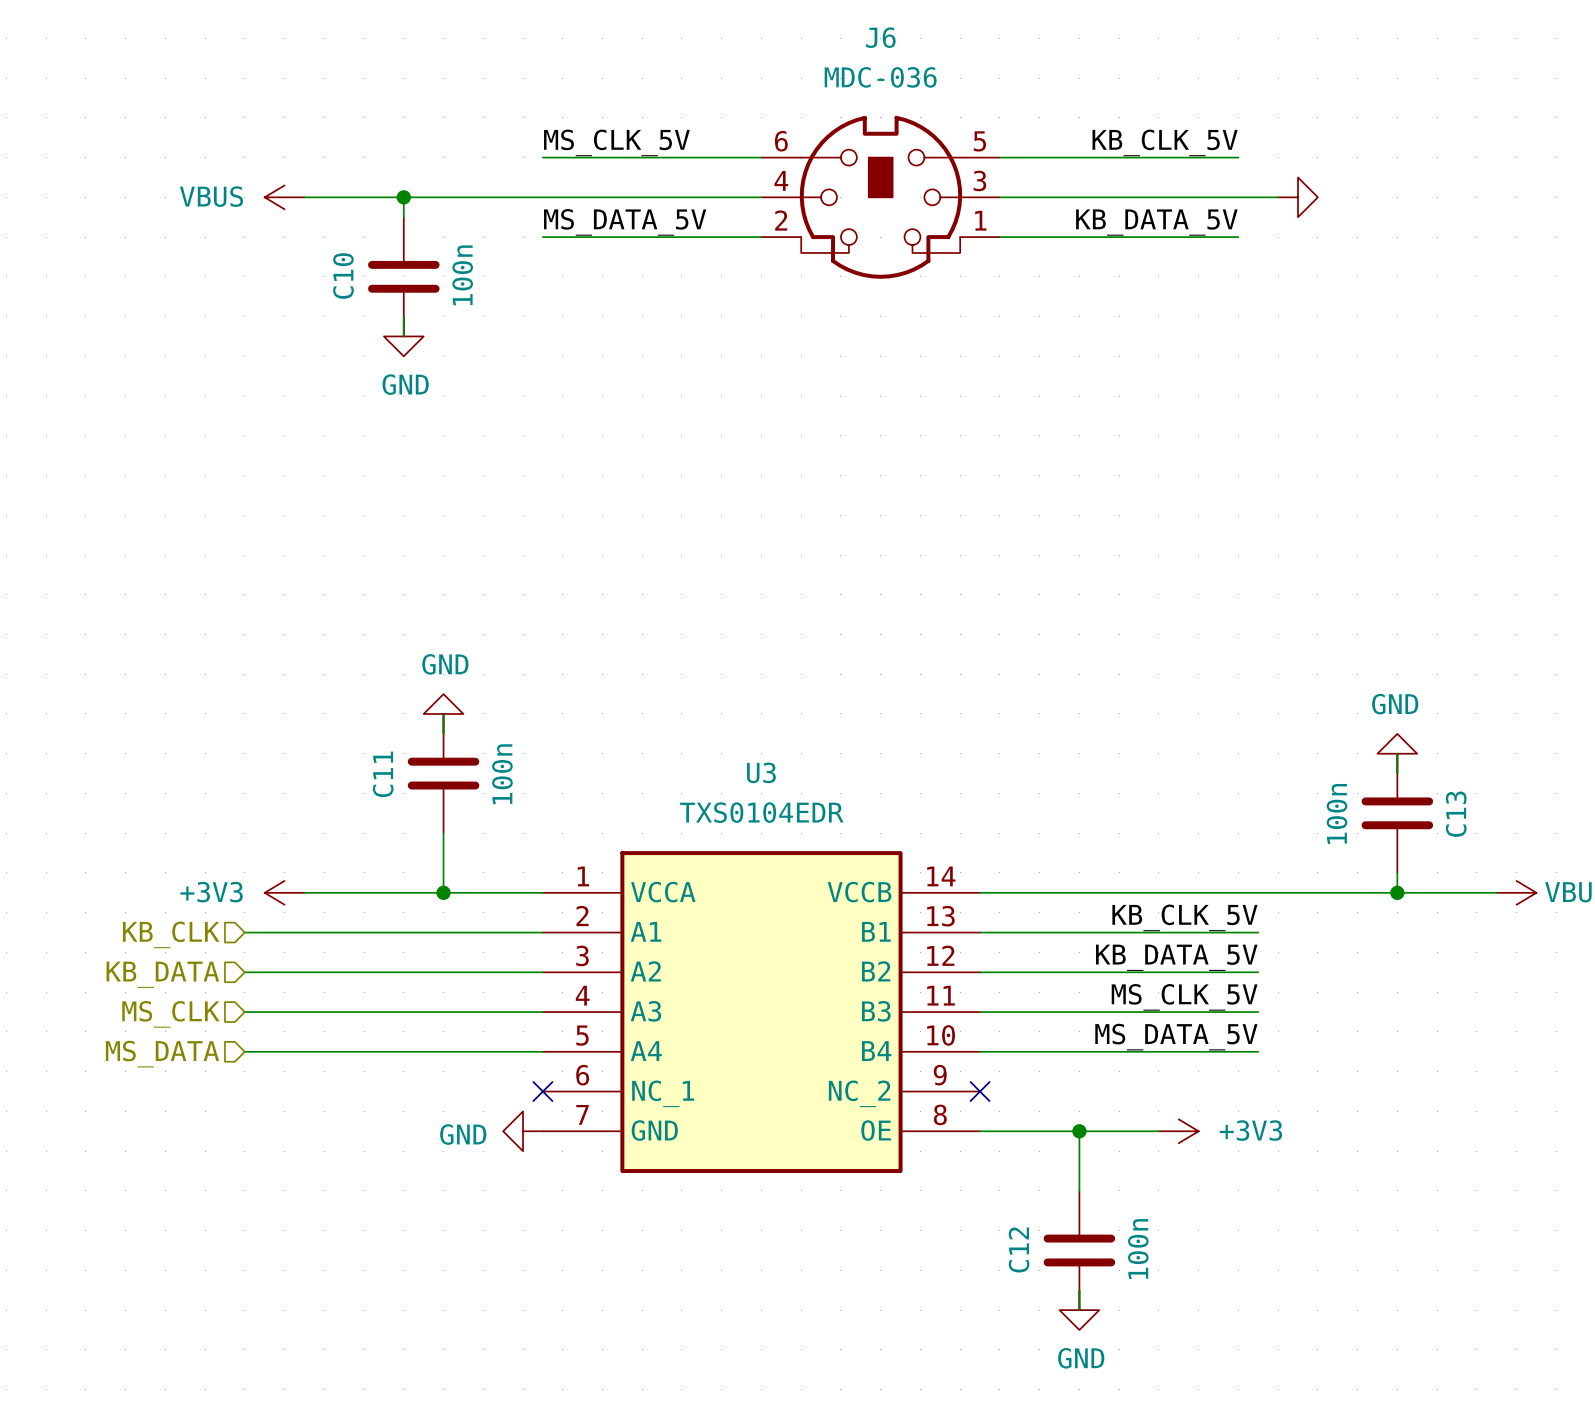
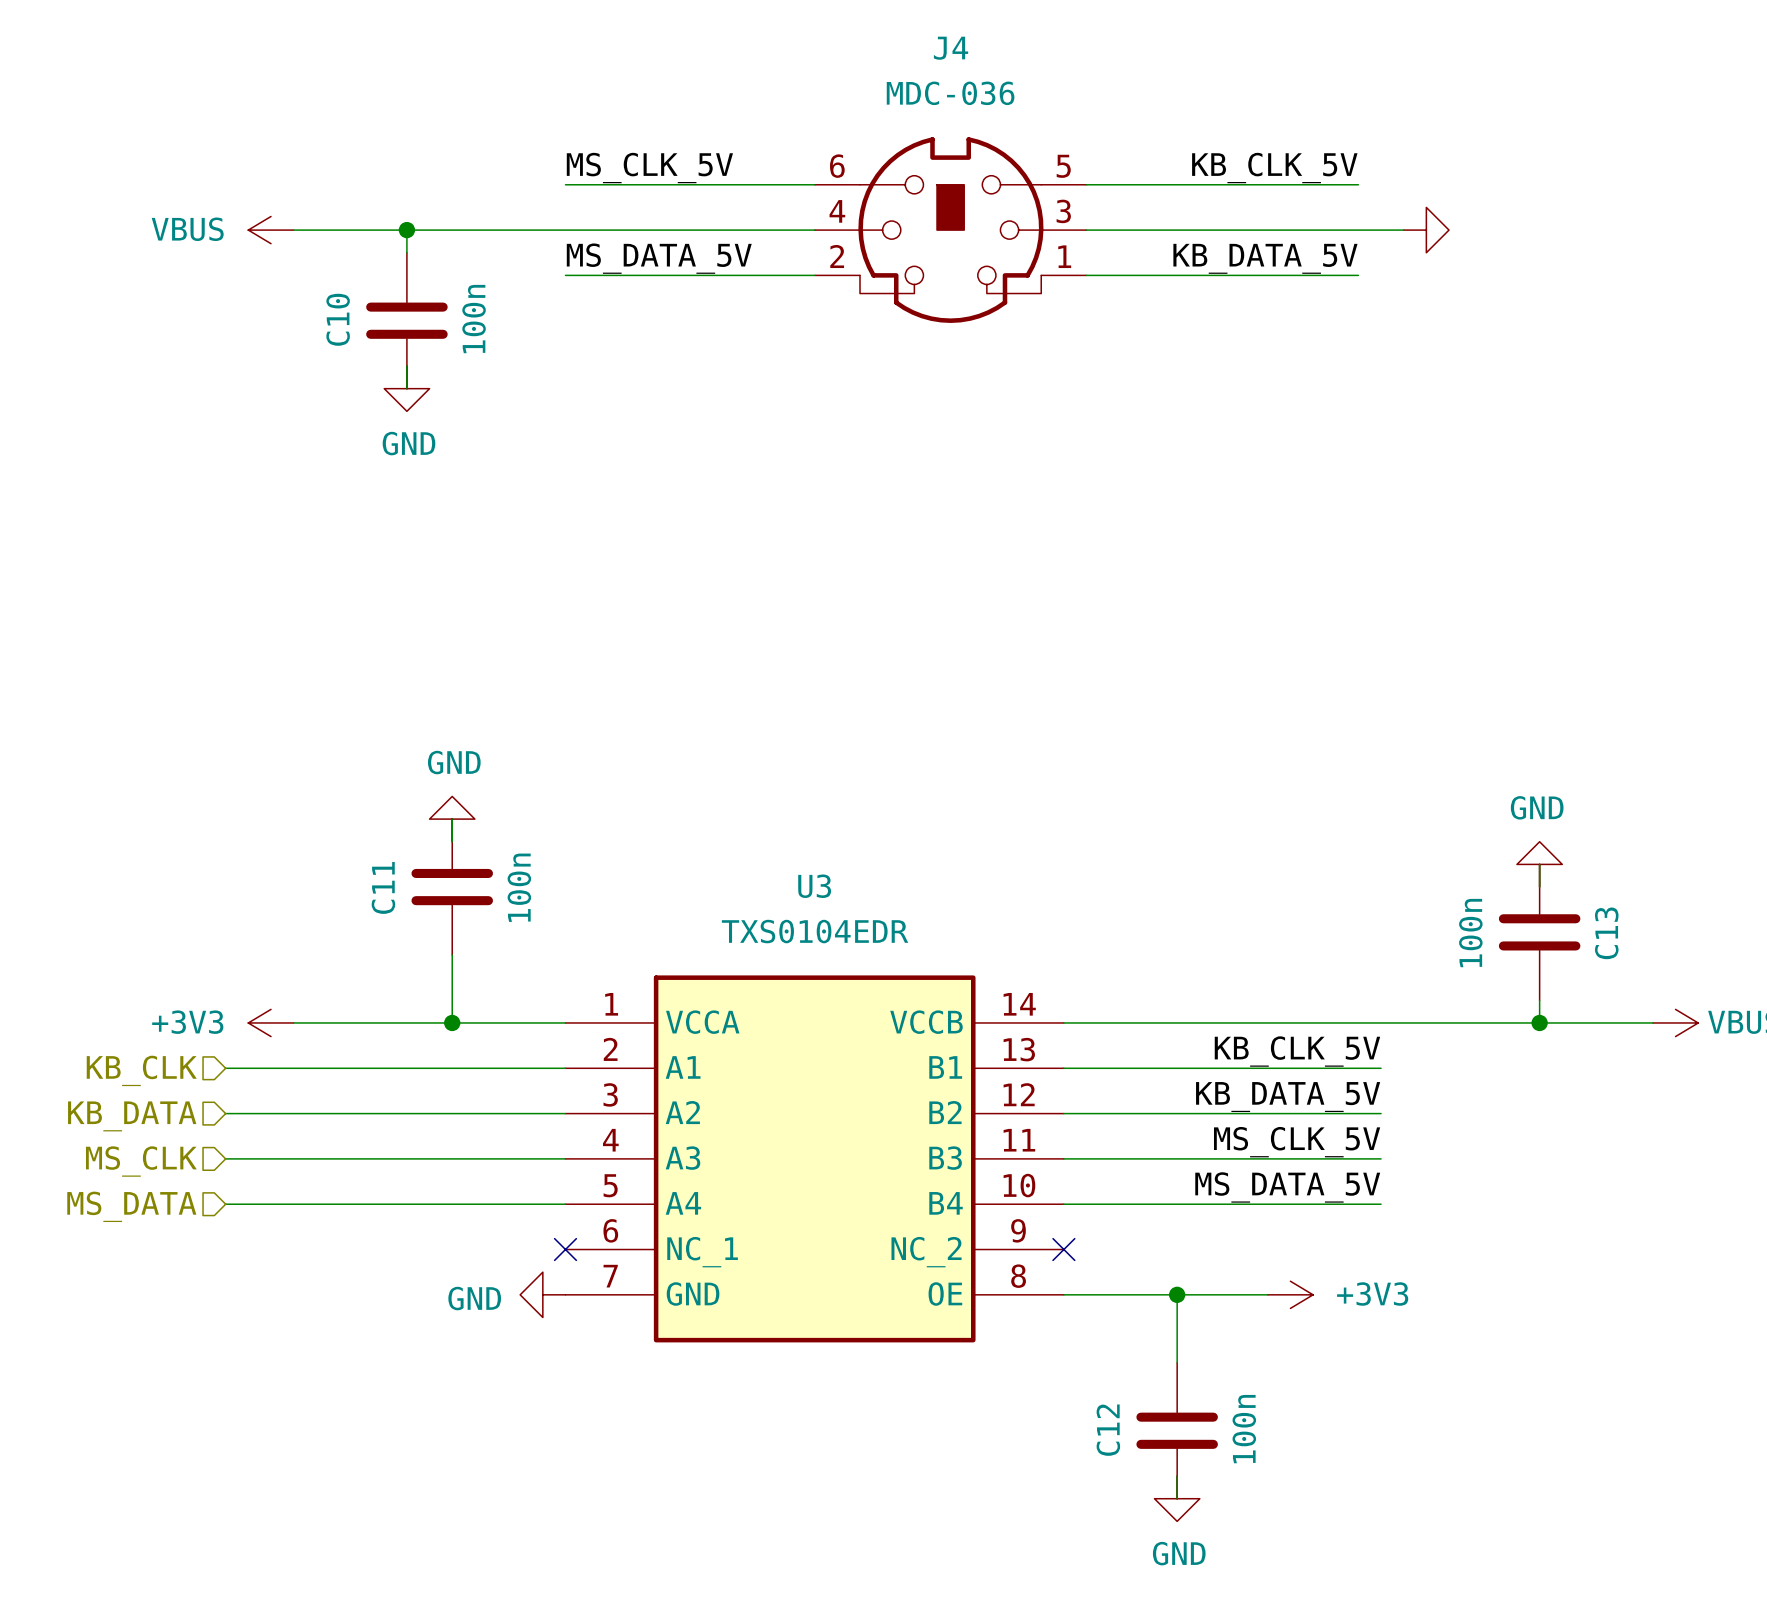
J6 name: J6 (880, 37) -> J4 (951, 48)

